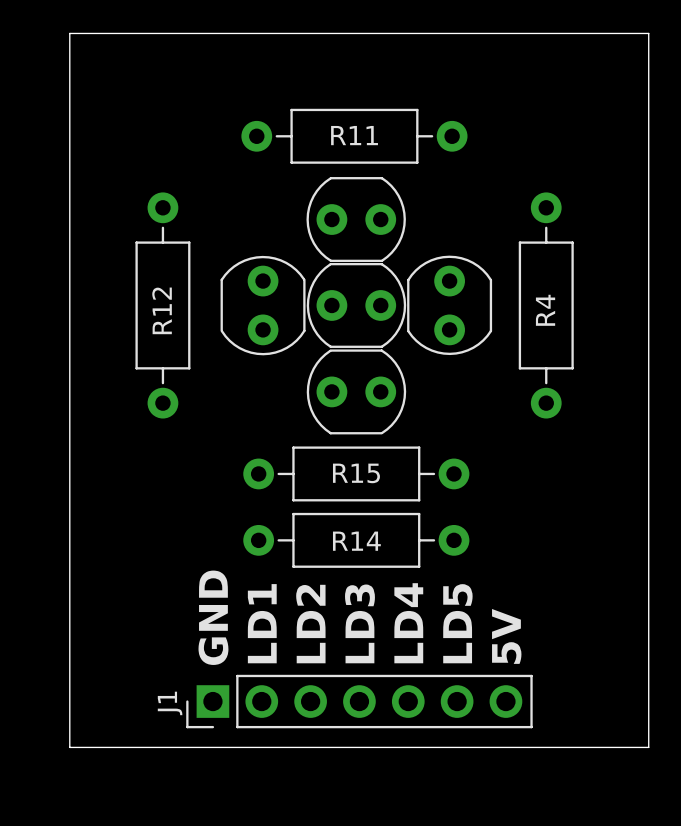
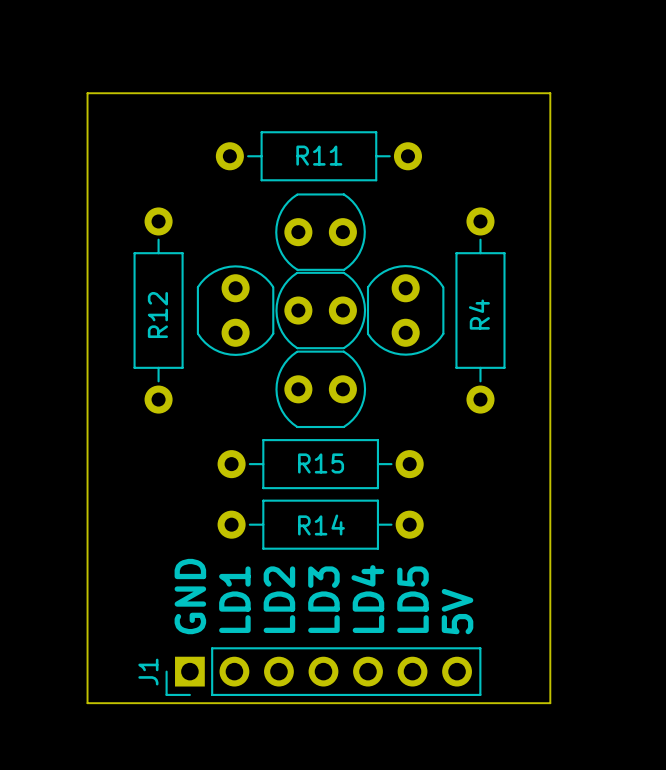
board edge: (69, 33) (648, 33) (648, 747) (69, 747) (69, 33) -> (87, 93) (87, 703) (550, 703) (550, 93) (87, 93)
R12 position: (162, 305) -> (158, 310)
R4 position: (546, 305) -> (480, 310)

